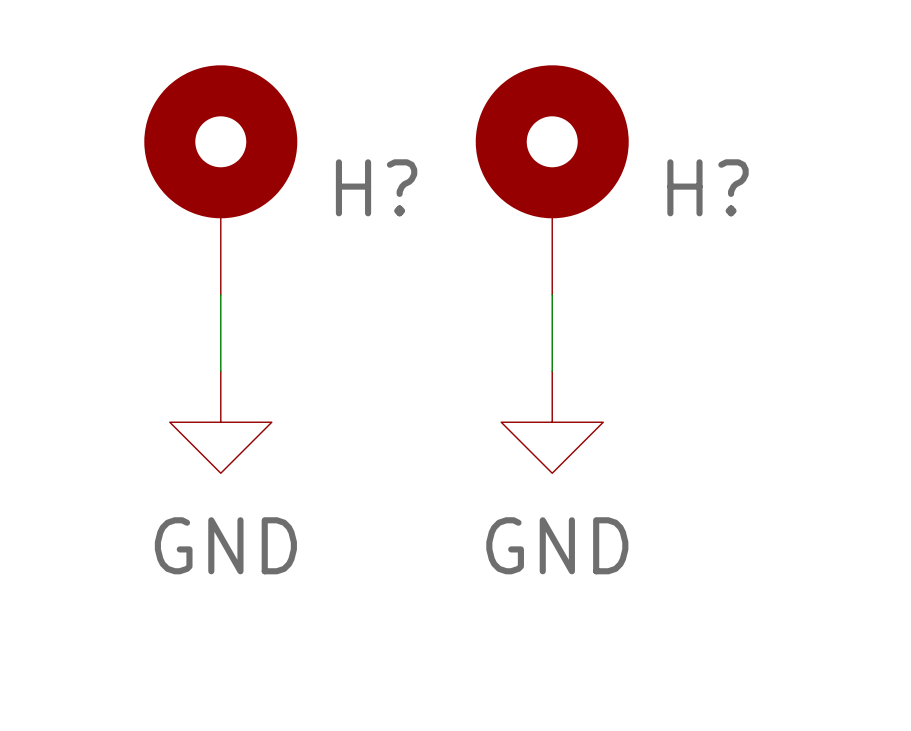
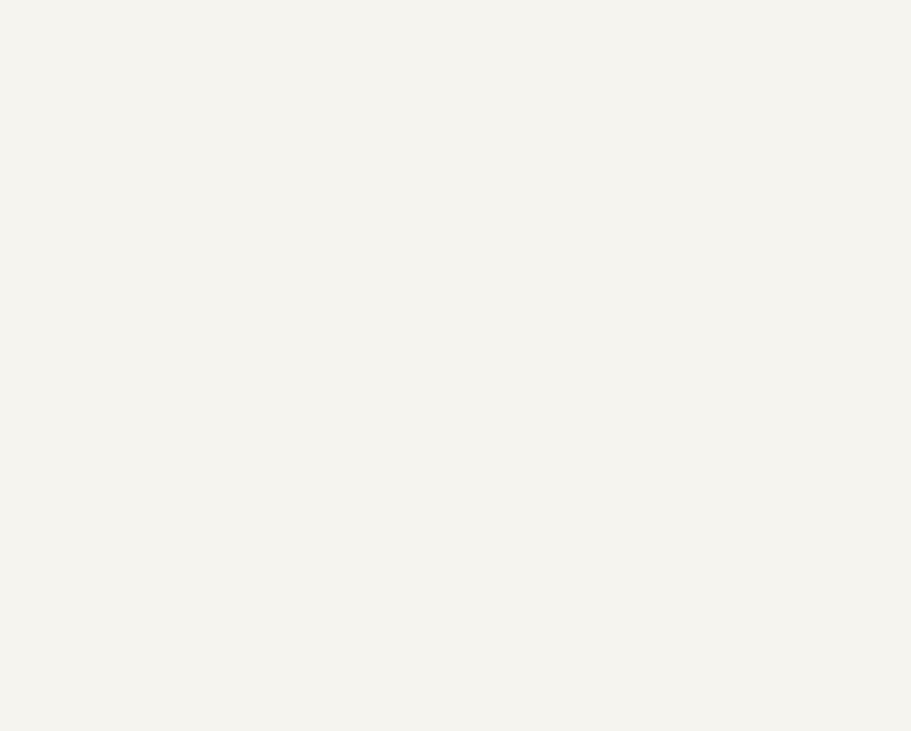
H?: (220, 180) -> none
H?: (552, 180) -> none
wire: (220, 294) (220, 371) -> none
wire: (552, 294) (552, 371) -> none
power symbol: GND (220, 422) -> none
power symbol: GND (552, 422) -> none

